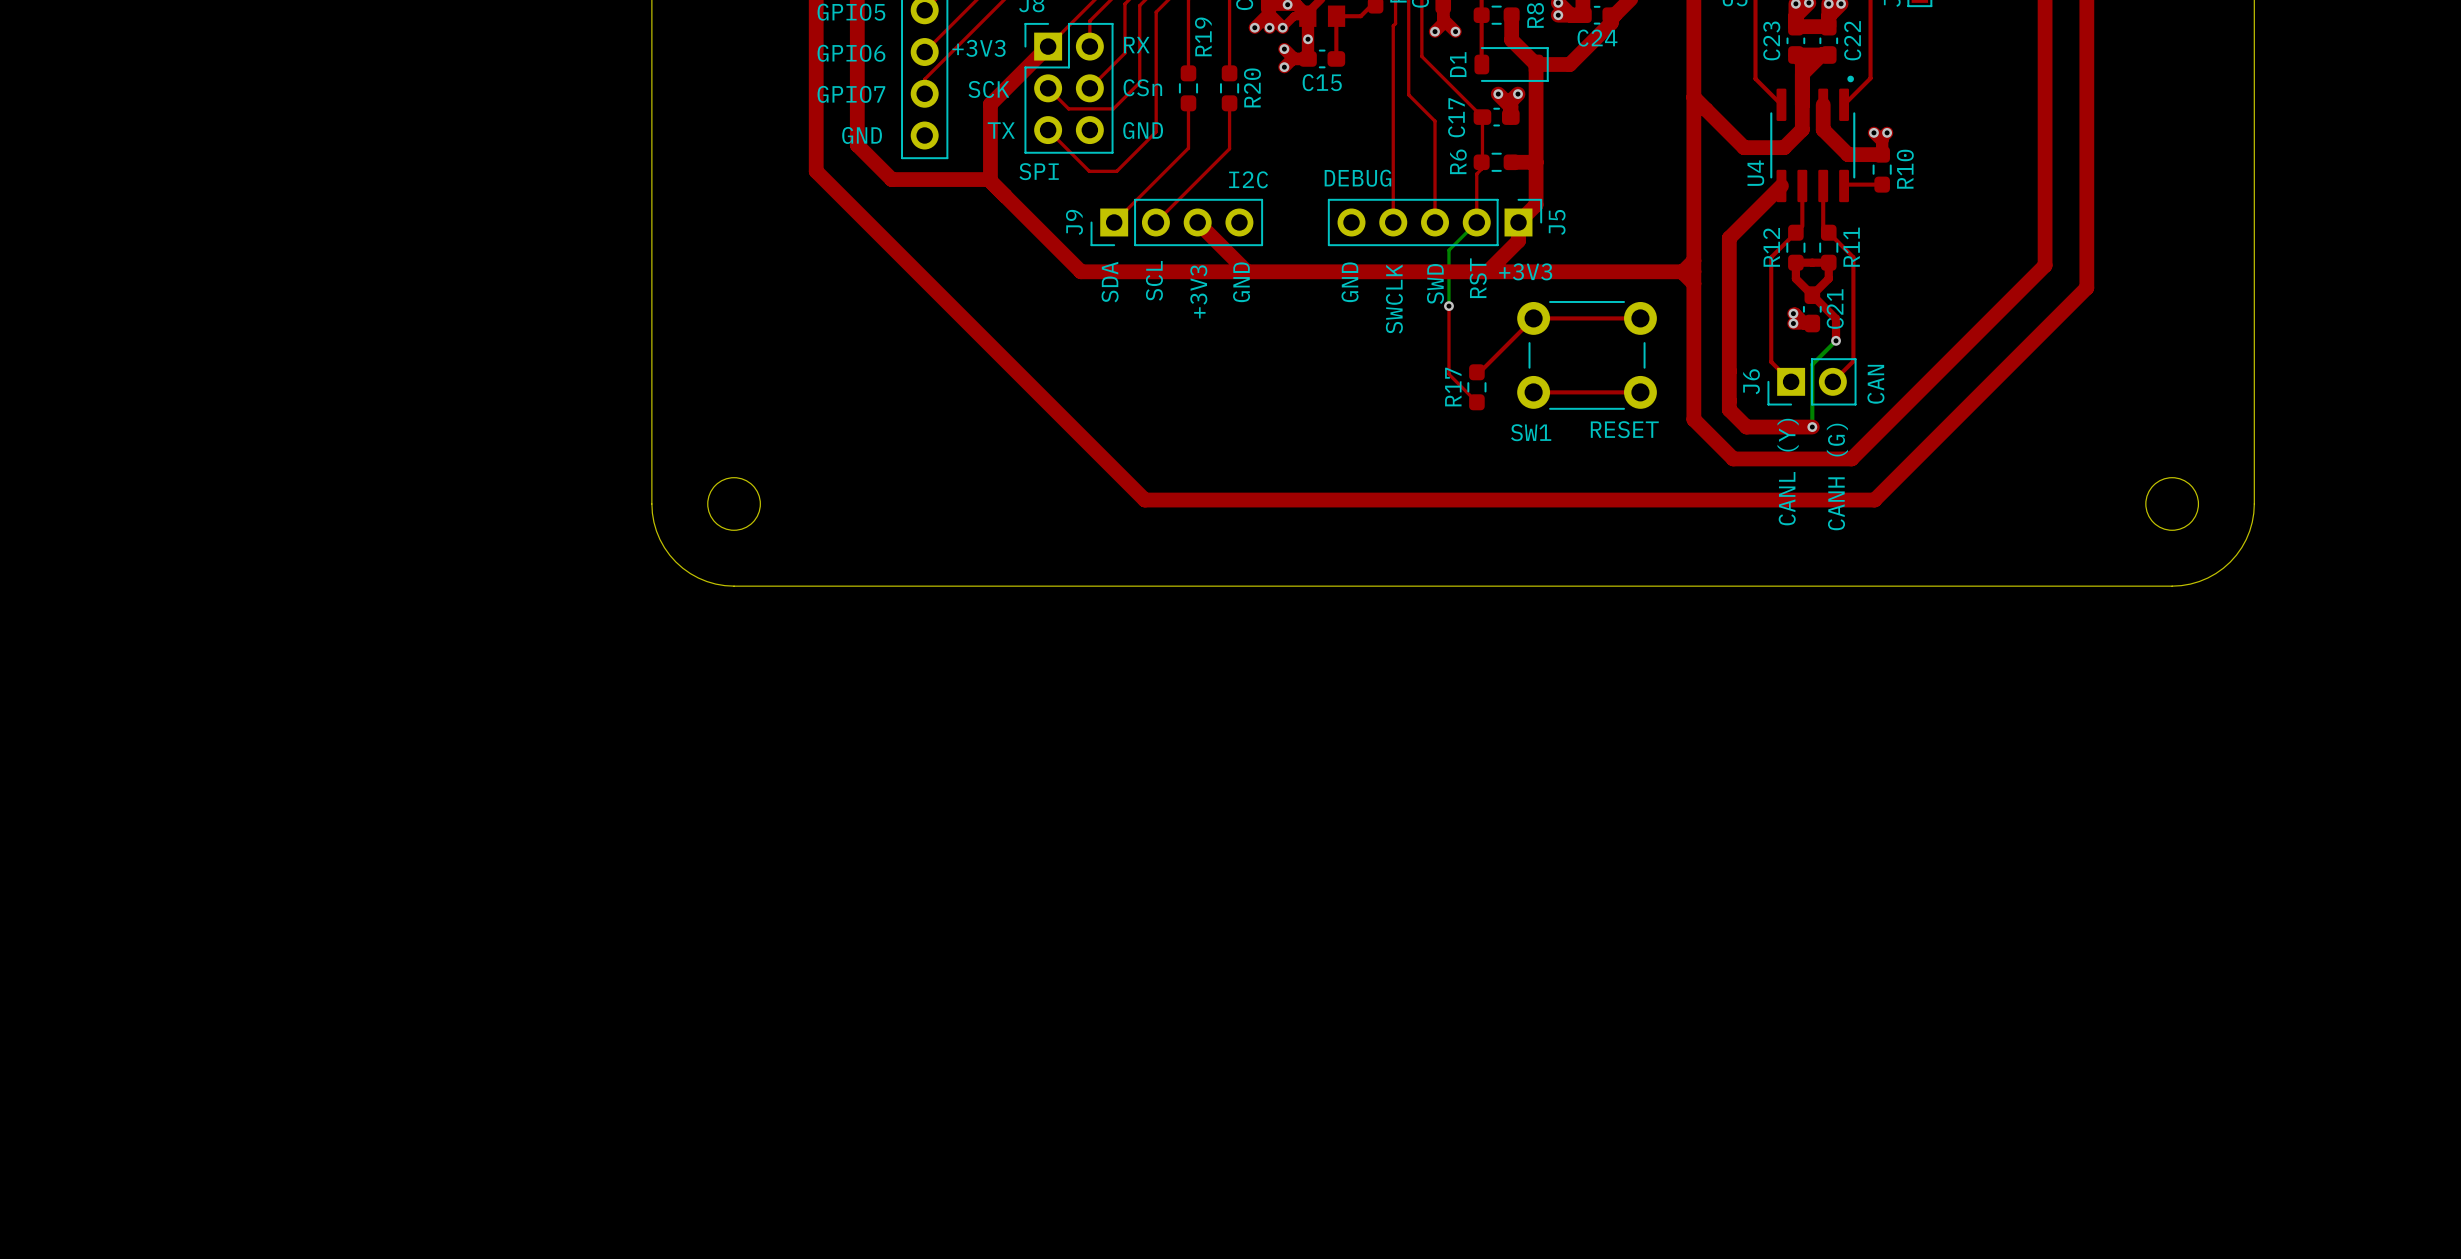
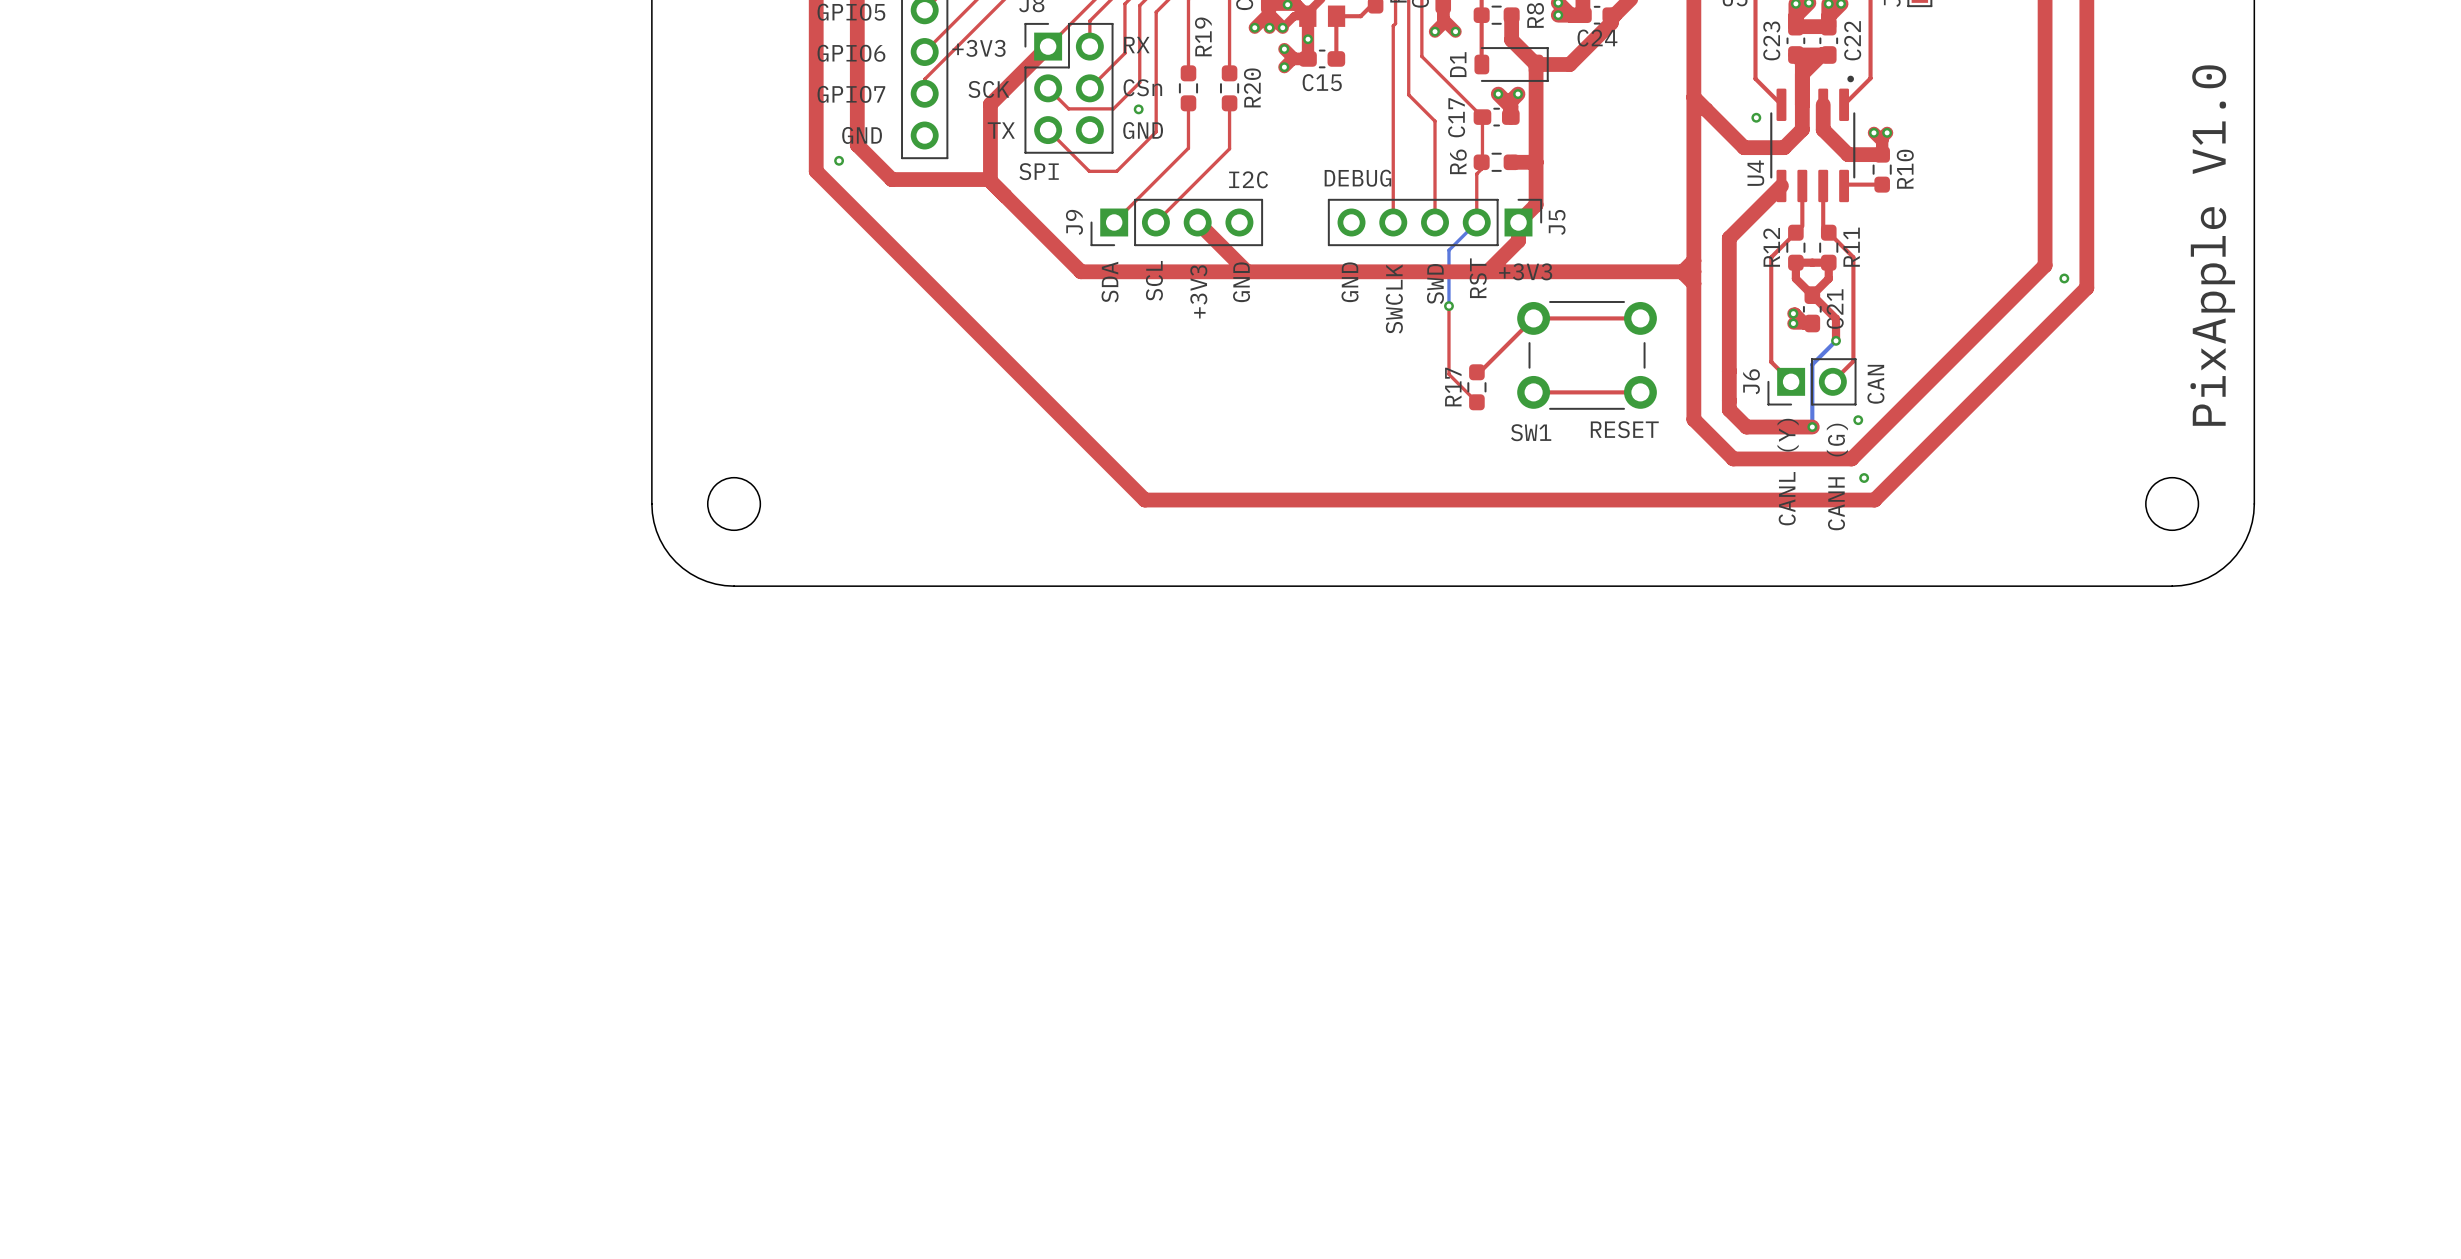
via: none -> (1138, 109)
via: none -> (1756, 117)
via: none -> (839, 160)
text: none -> PixApple V1.0 (2212, 245)
via: none -> (2064, 278)
via: none -> (1858, 420)
via: none -> (1864, 478)

